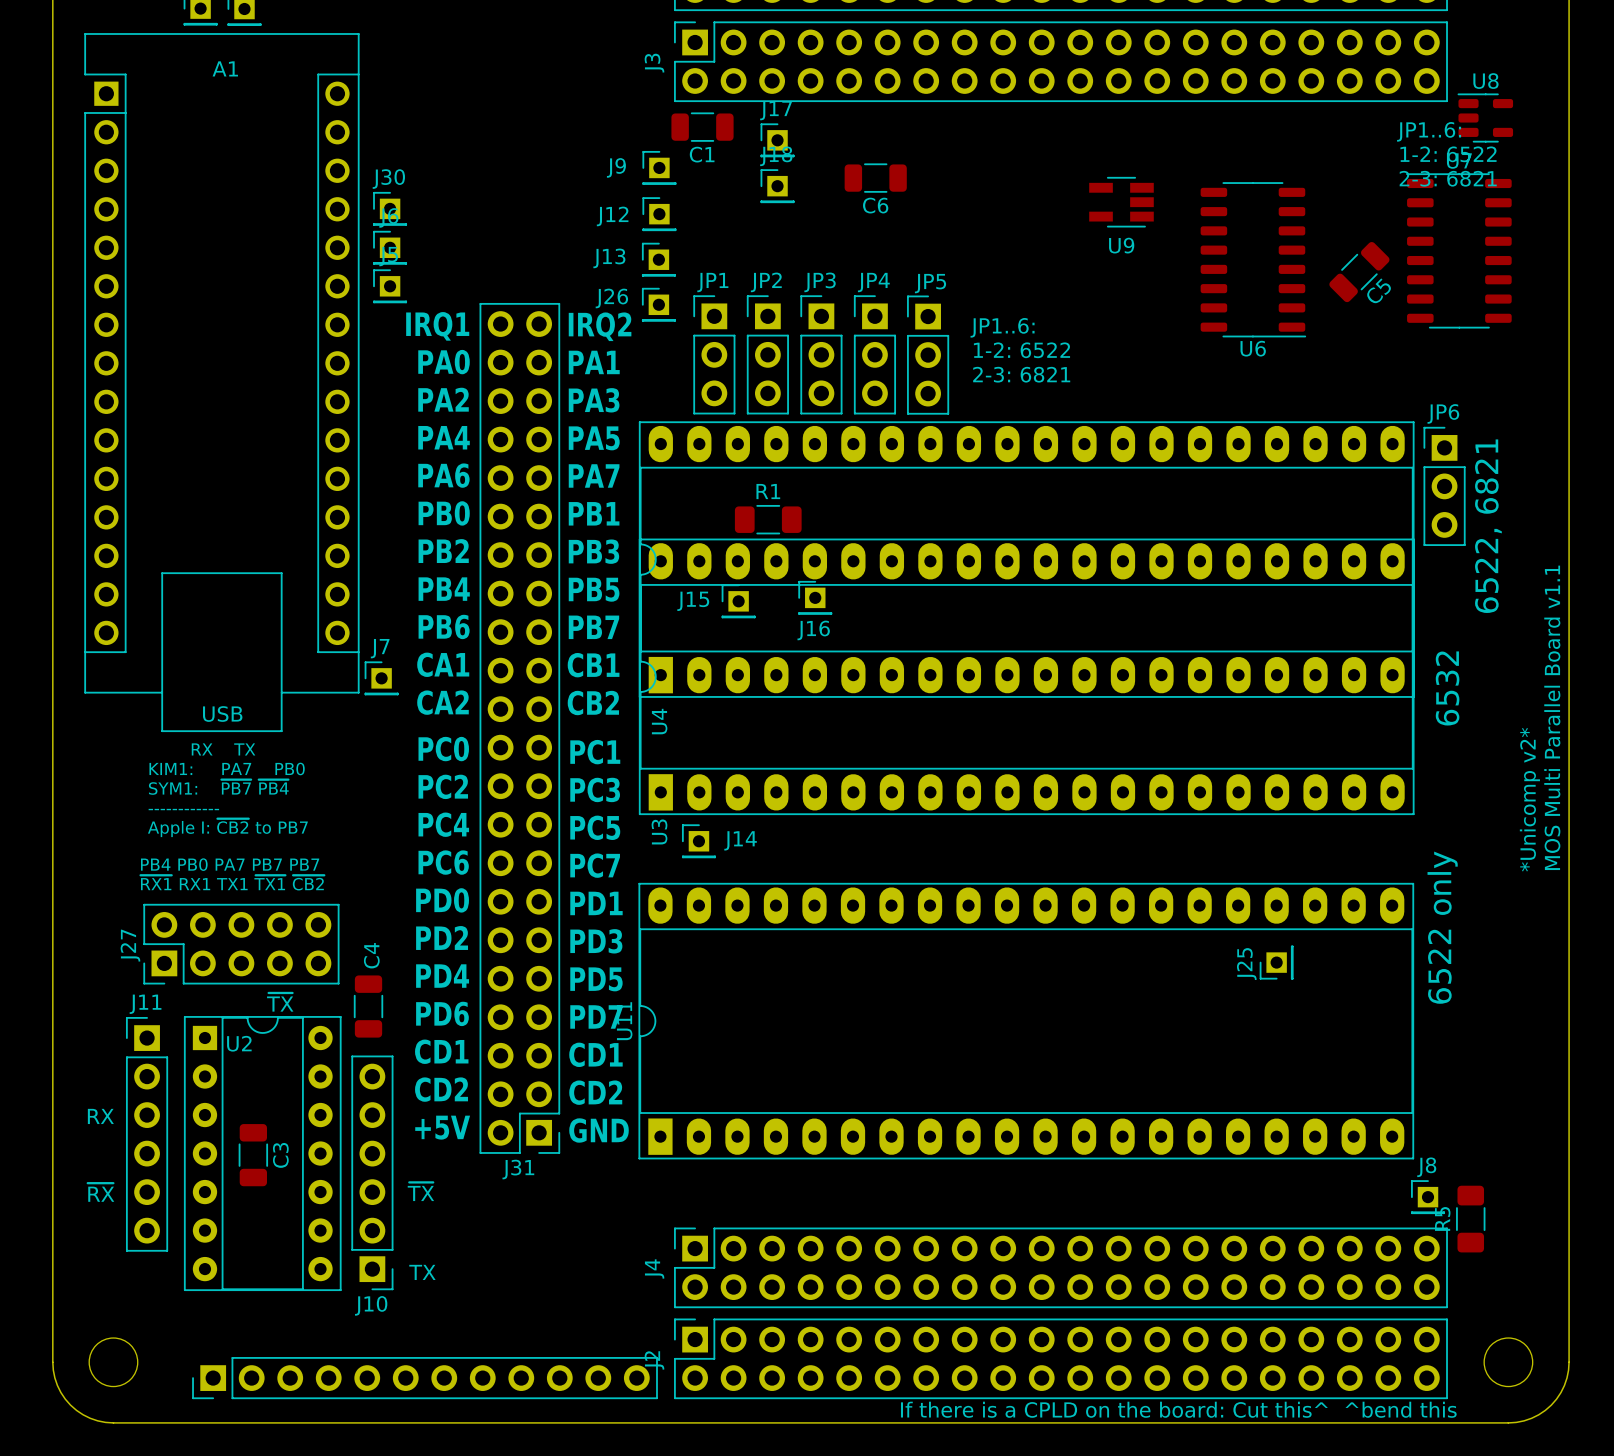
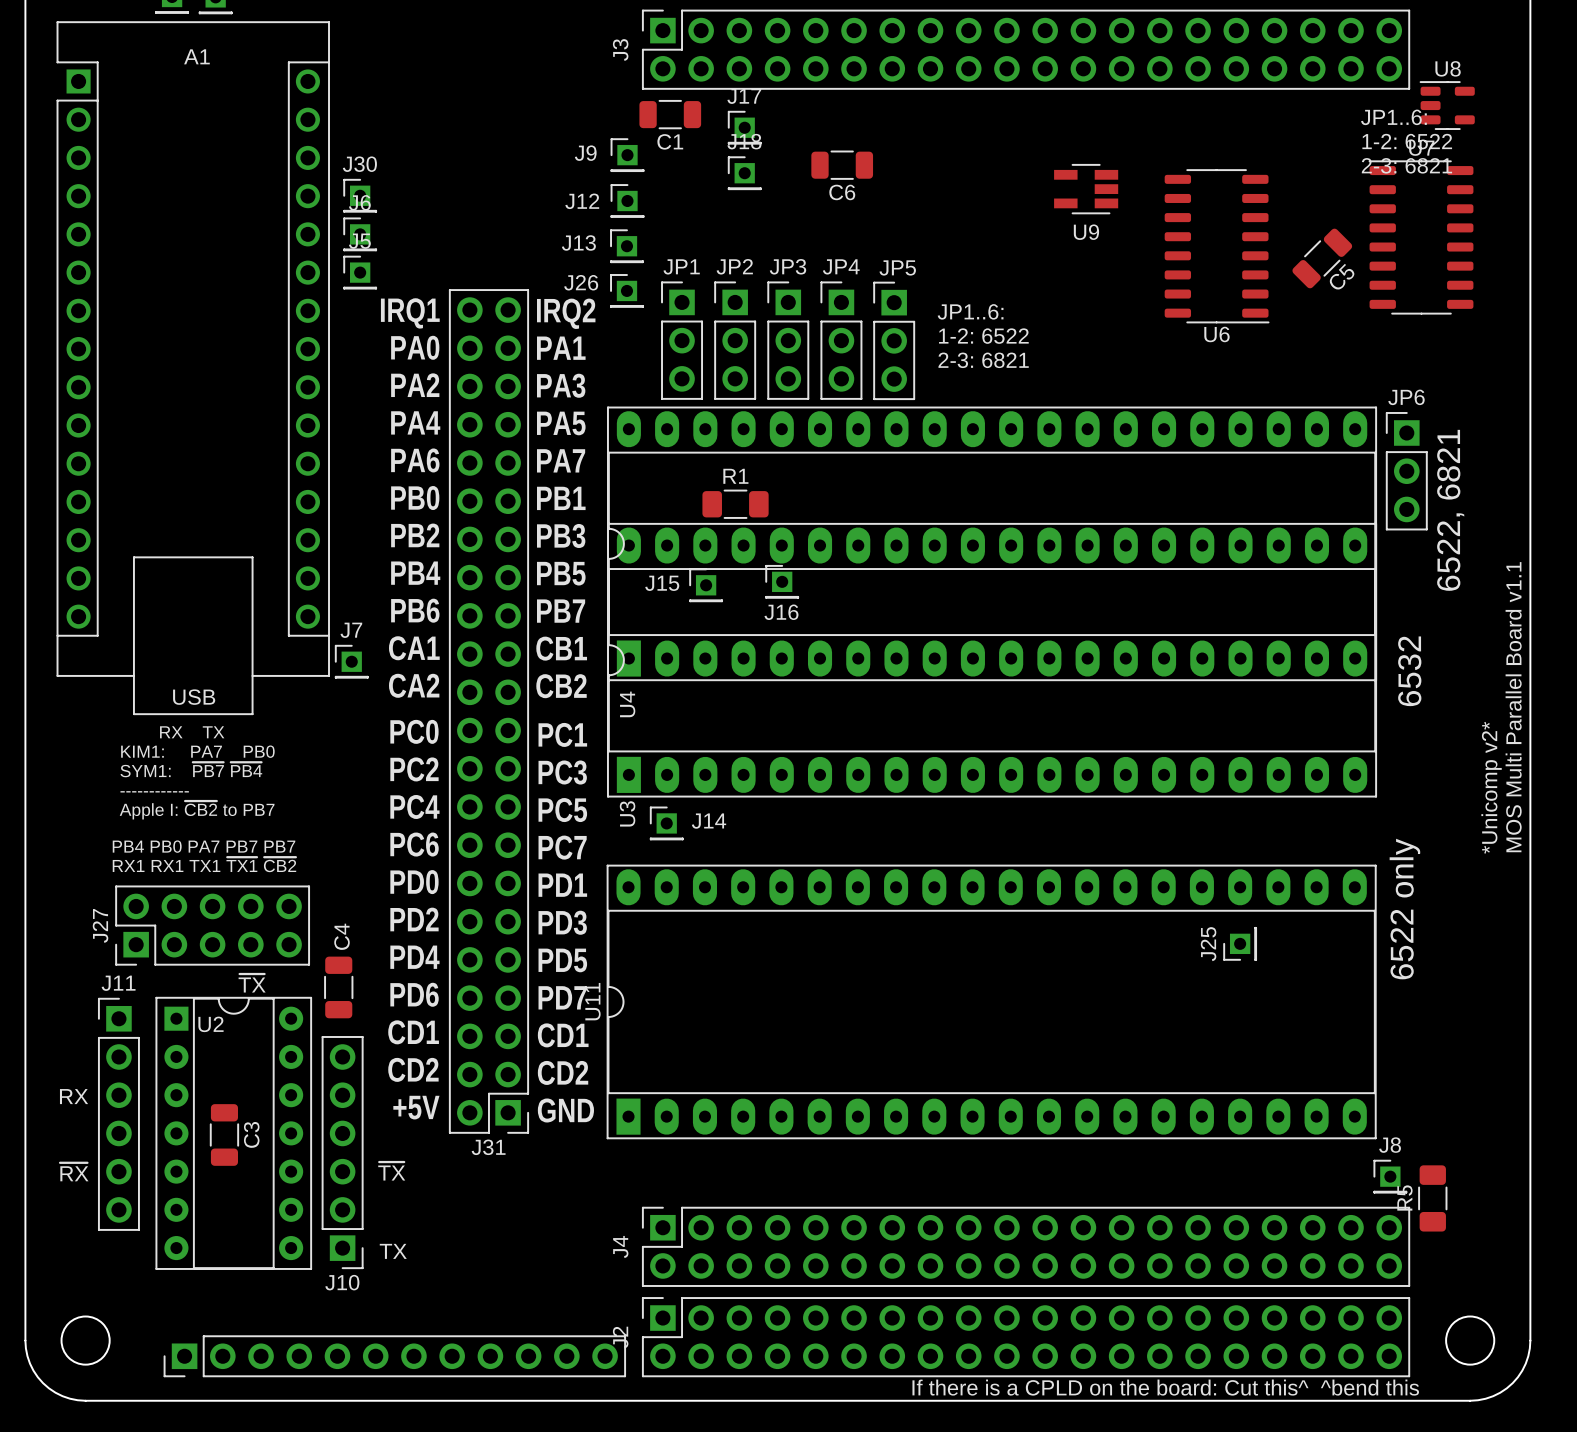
text: ~{RX1} RX1 TX1 ~{TX1} ~{CB2} (232, 882) -> RX1 RX1 TX1 ~{TX1} ~{CB2} (204, 864)

